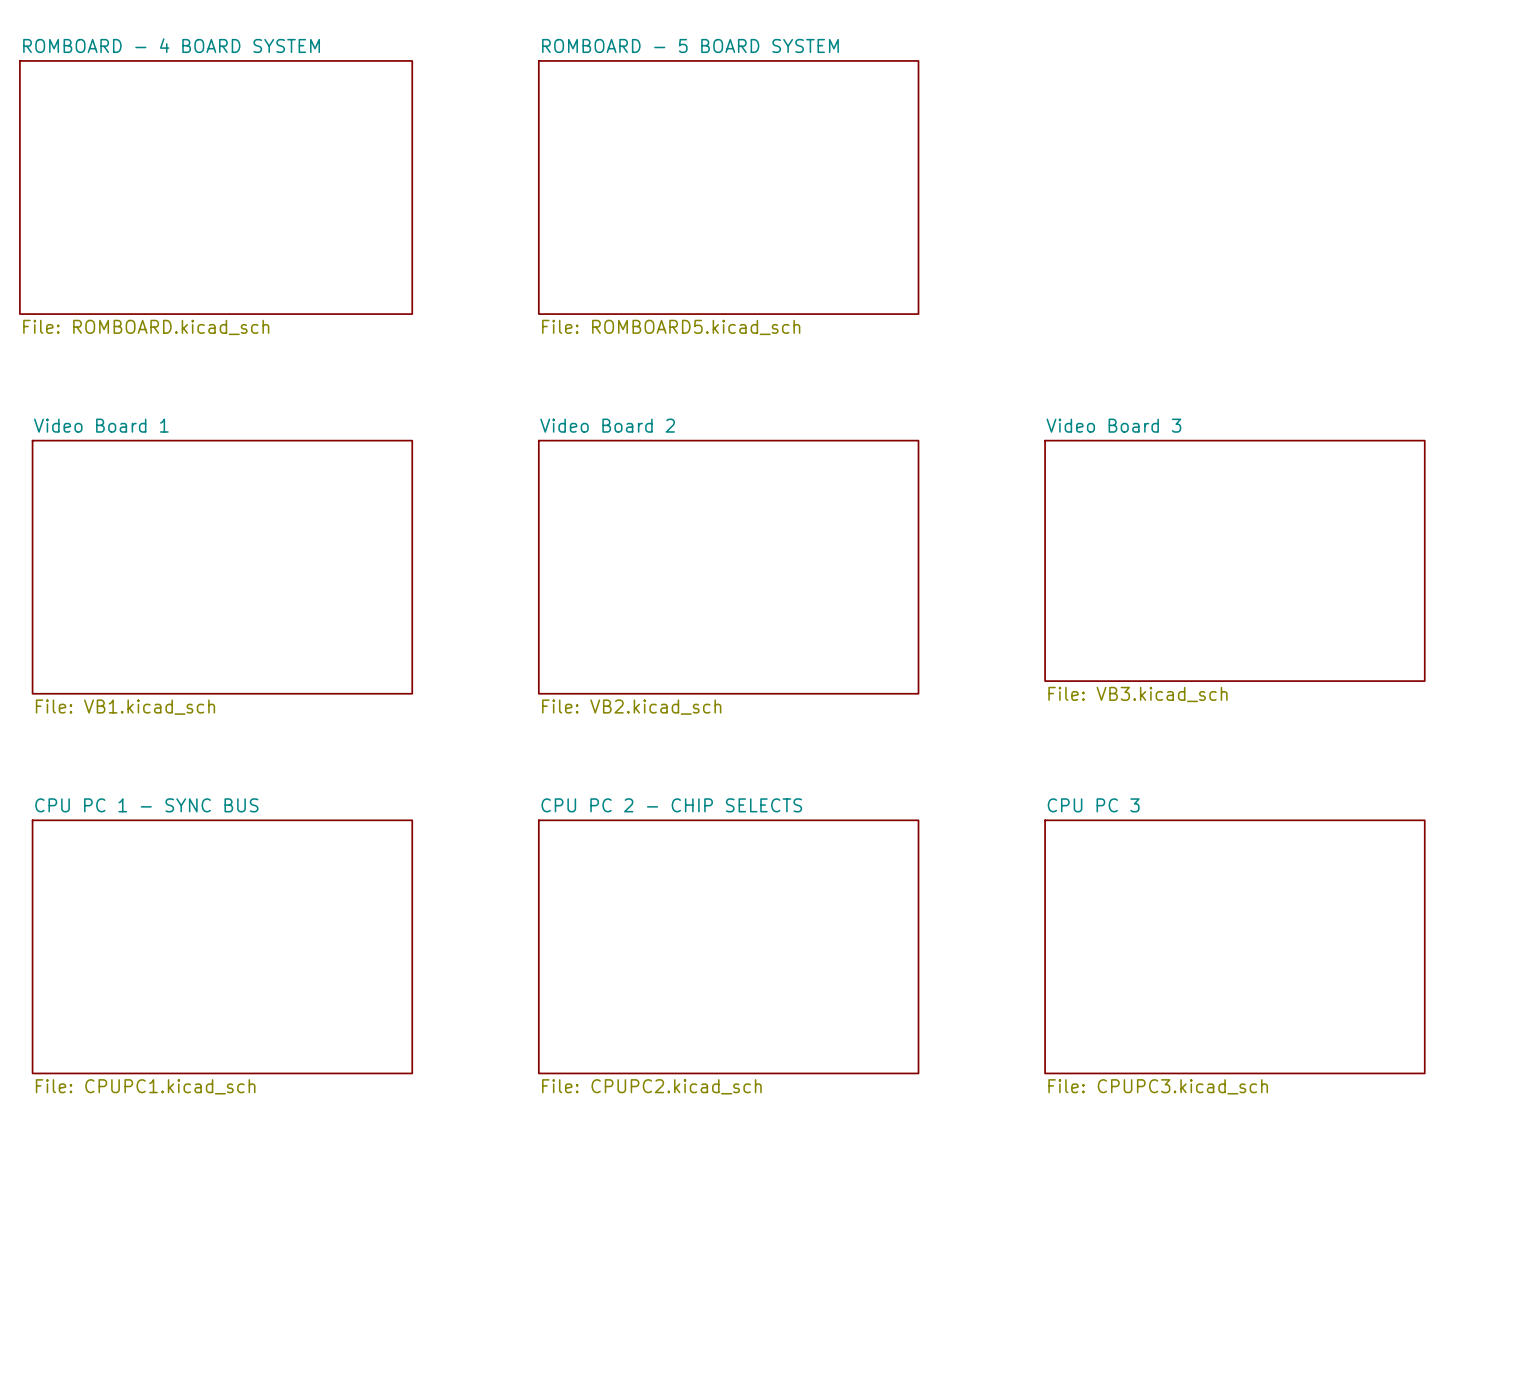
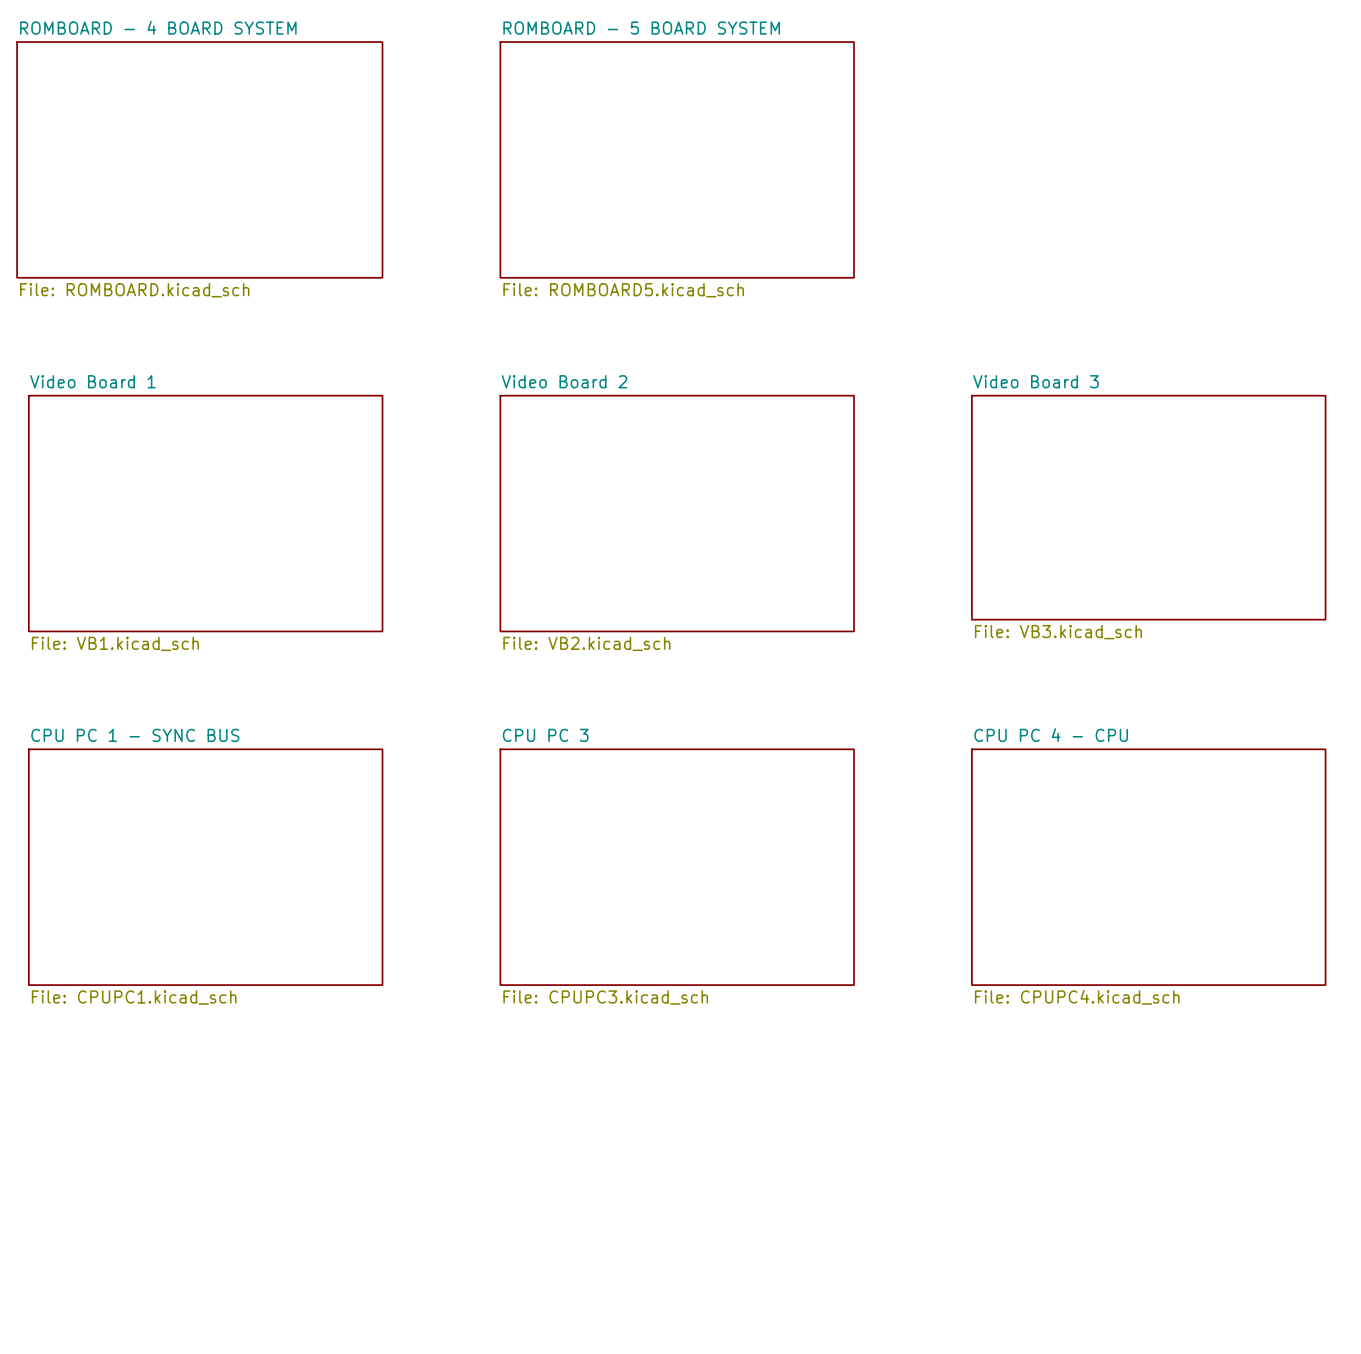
sheet CPU PC 2 - CHIP SELECTS name: CPU PC 2 - CHIP SELECTS (671, 805) -> CPU PC 3 (545, 735)
sheet CPU PC 3 name: CPU PC 3 (1093, 805) -> CPU PC 4 - CPU (1051, 735)
sheet CPU PC 2 - CHIP SELECTS value: File: CPUPC2.kicad_sch (651, 1086) -> File: CPUPC3.kicad_sch (605, 997)
sheet CPU PC 3 value: File: CPUPC3.kicad_sch (1158, 1086) -> File: CPUPC4.kicad_sch (1077, 997)

